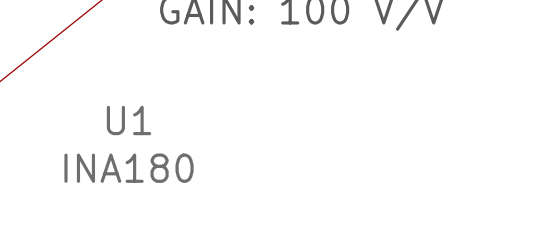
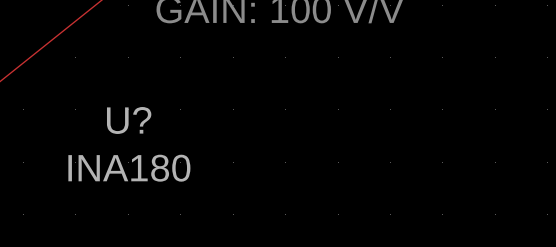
U1 name: U1 (129, 120) -> U? (129, 120)

